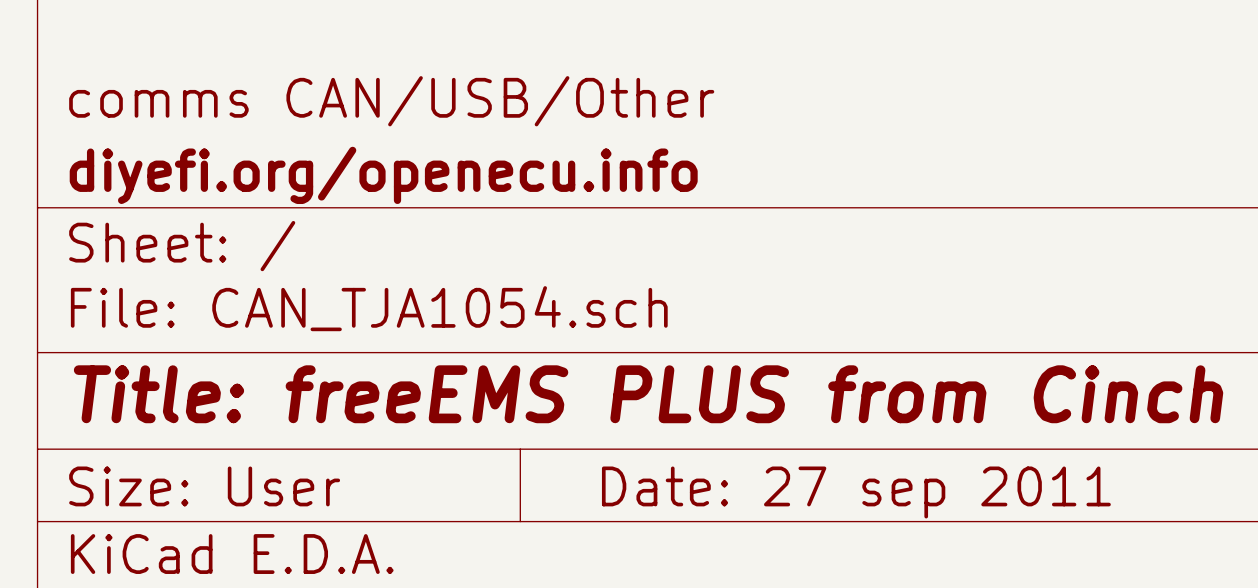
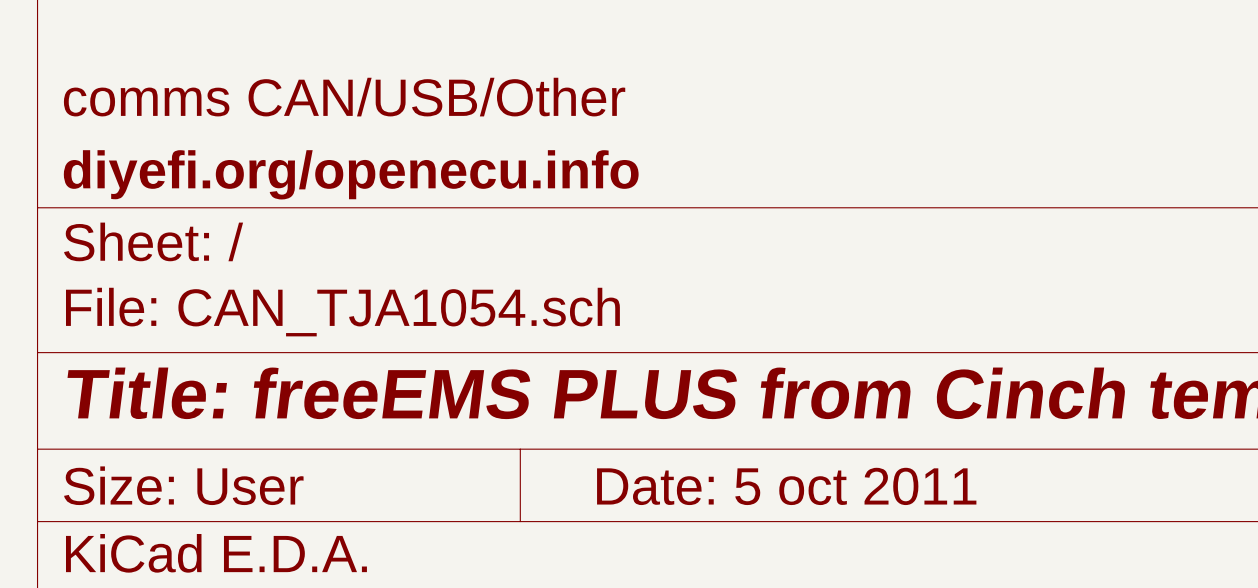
title block: Date: 27 sep 2011 (856, 492) -> Date: 5 oct 2011 (786, 486)

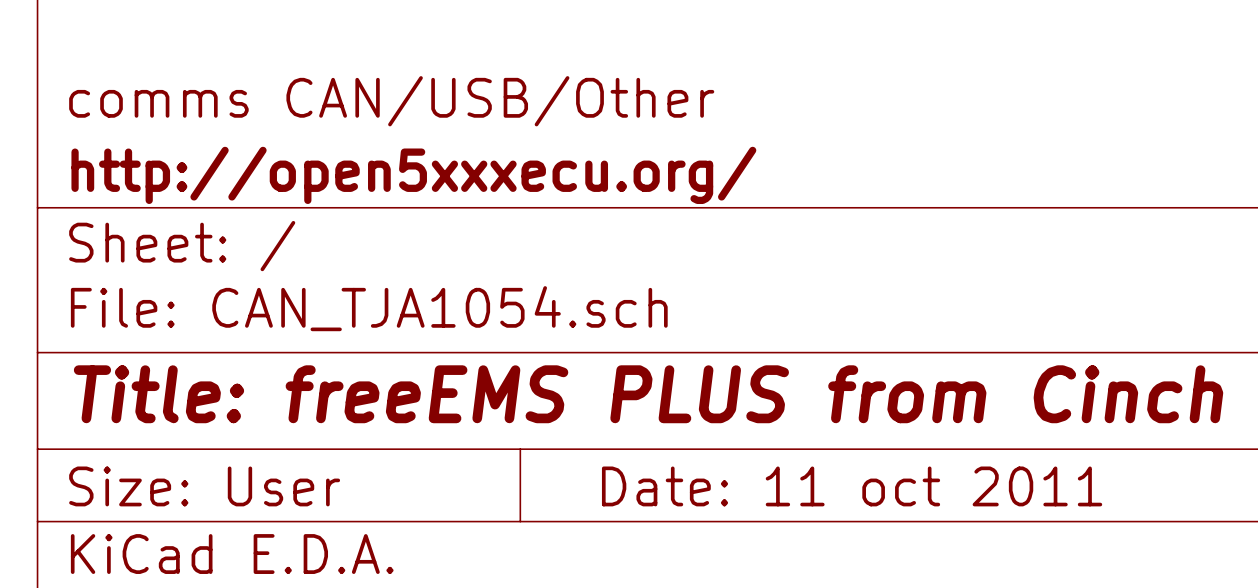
title block: diyefi.org/openecu.info (351, 174) -> http://open5xxxecu.org/ (413, 175)
title block: Date: 5 oct 2011 (786, 486) -> Date: 11 oct 2011 (852, 486)

